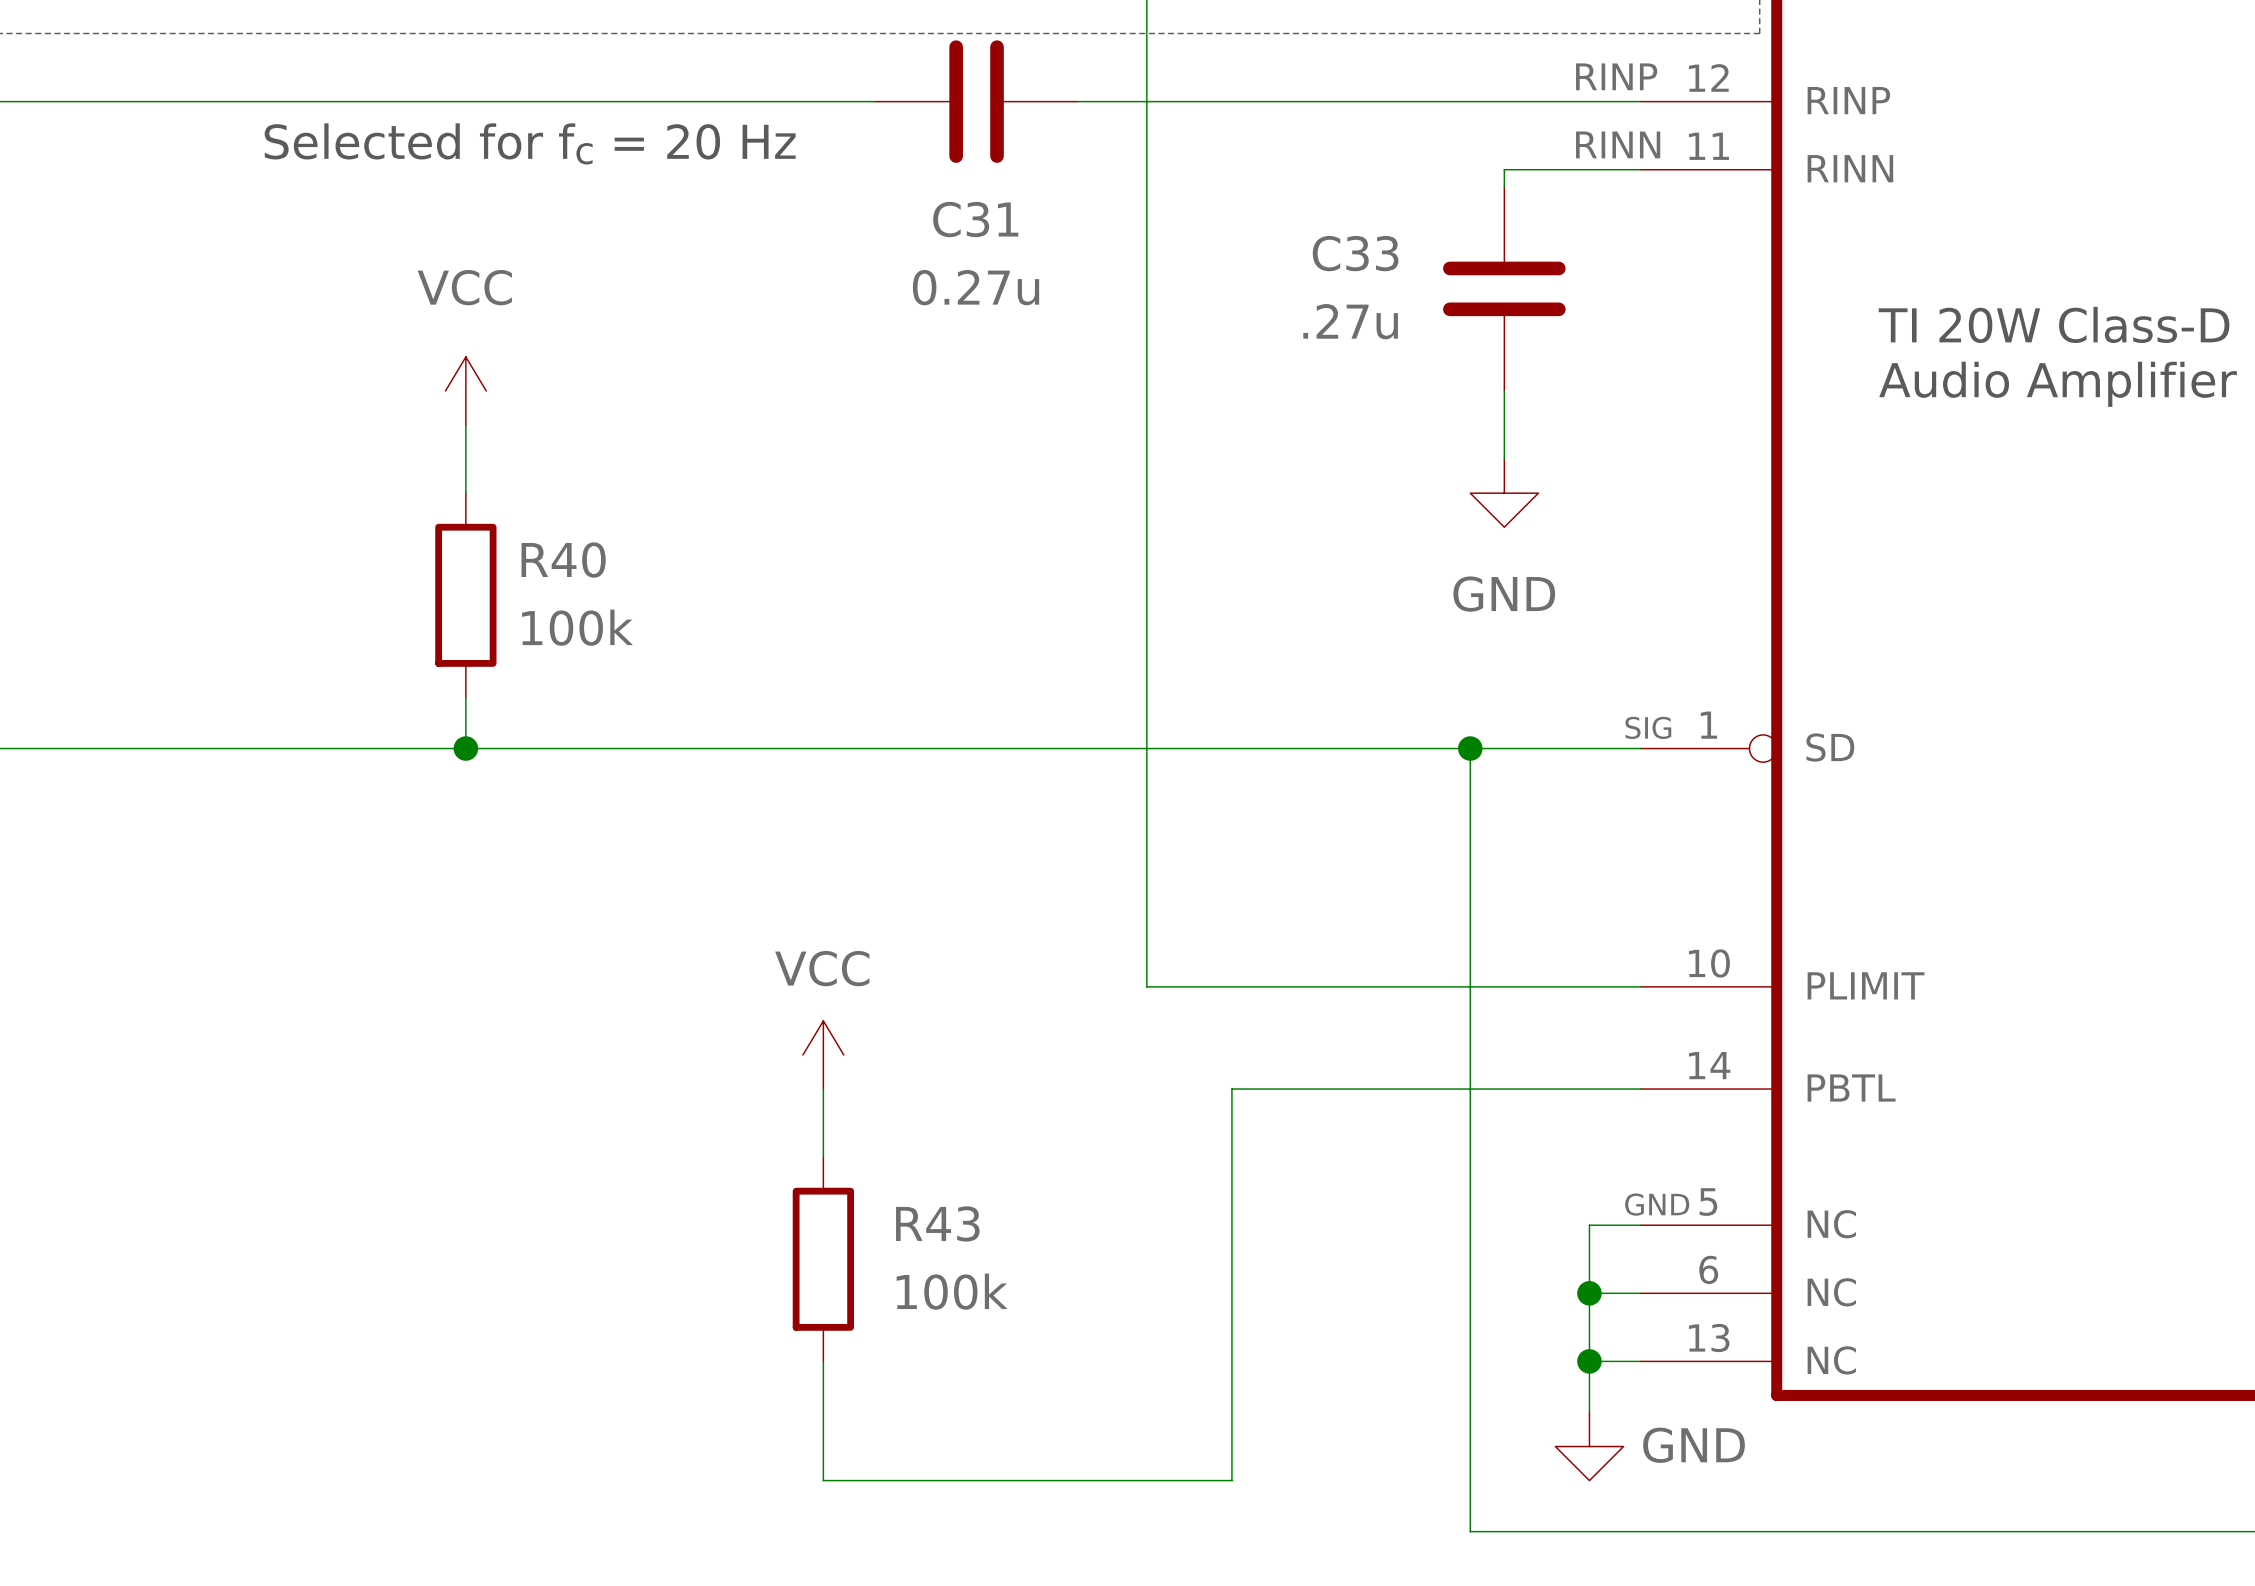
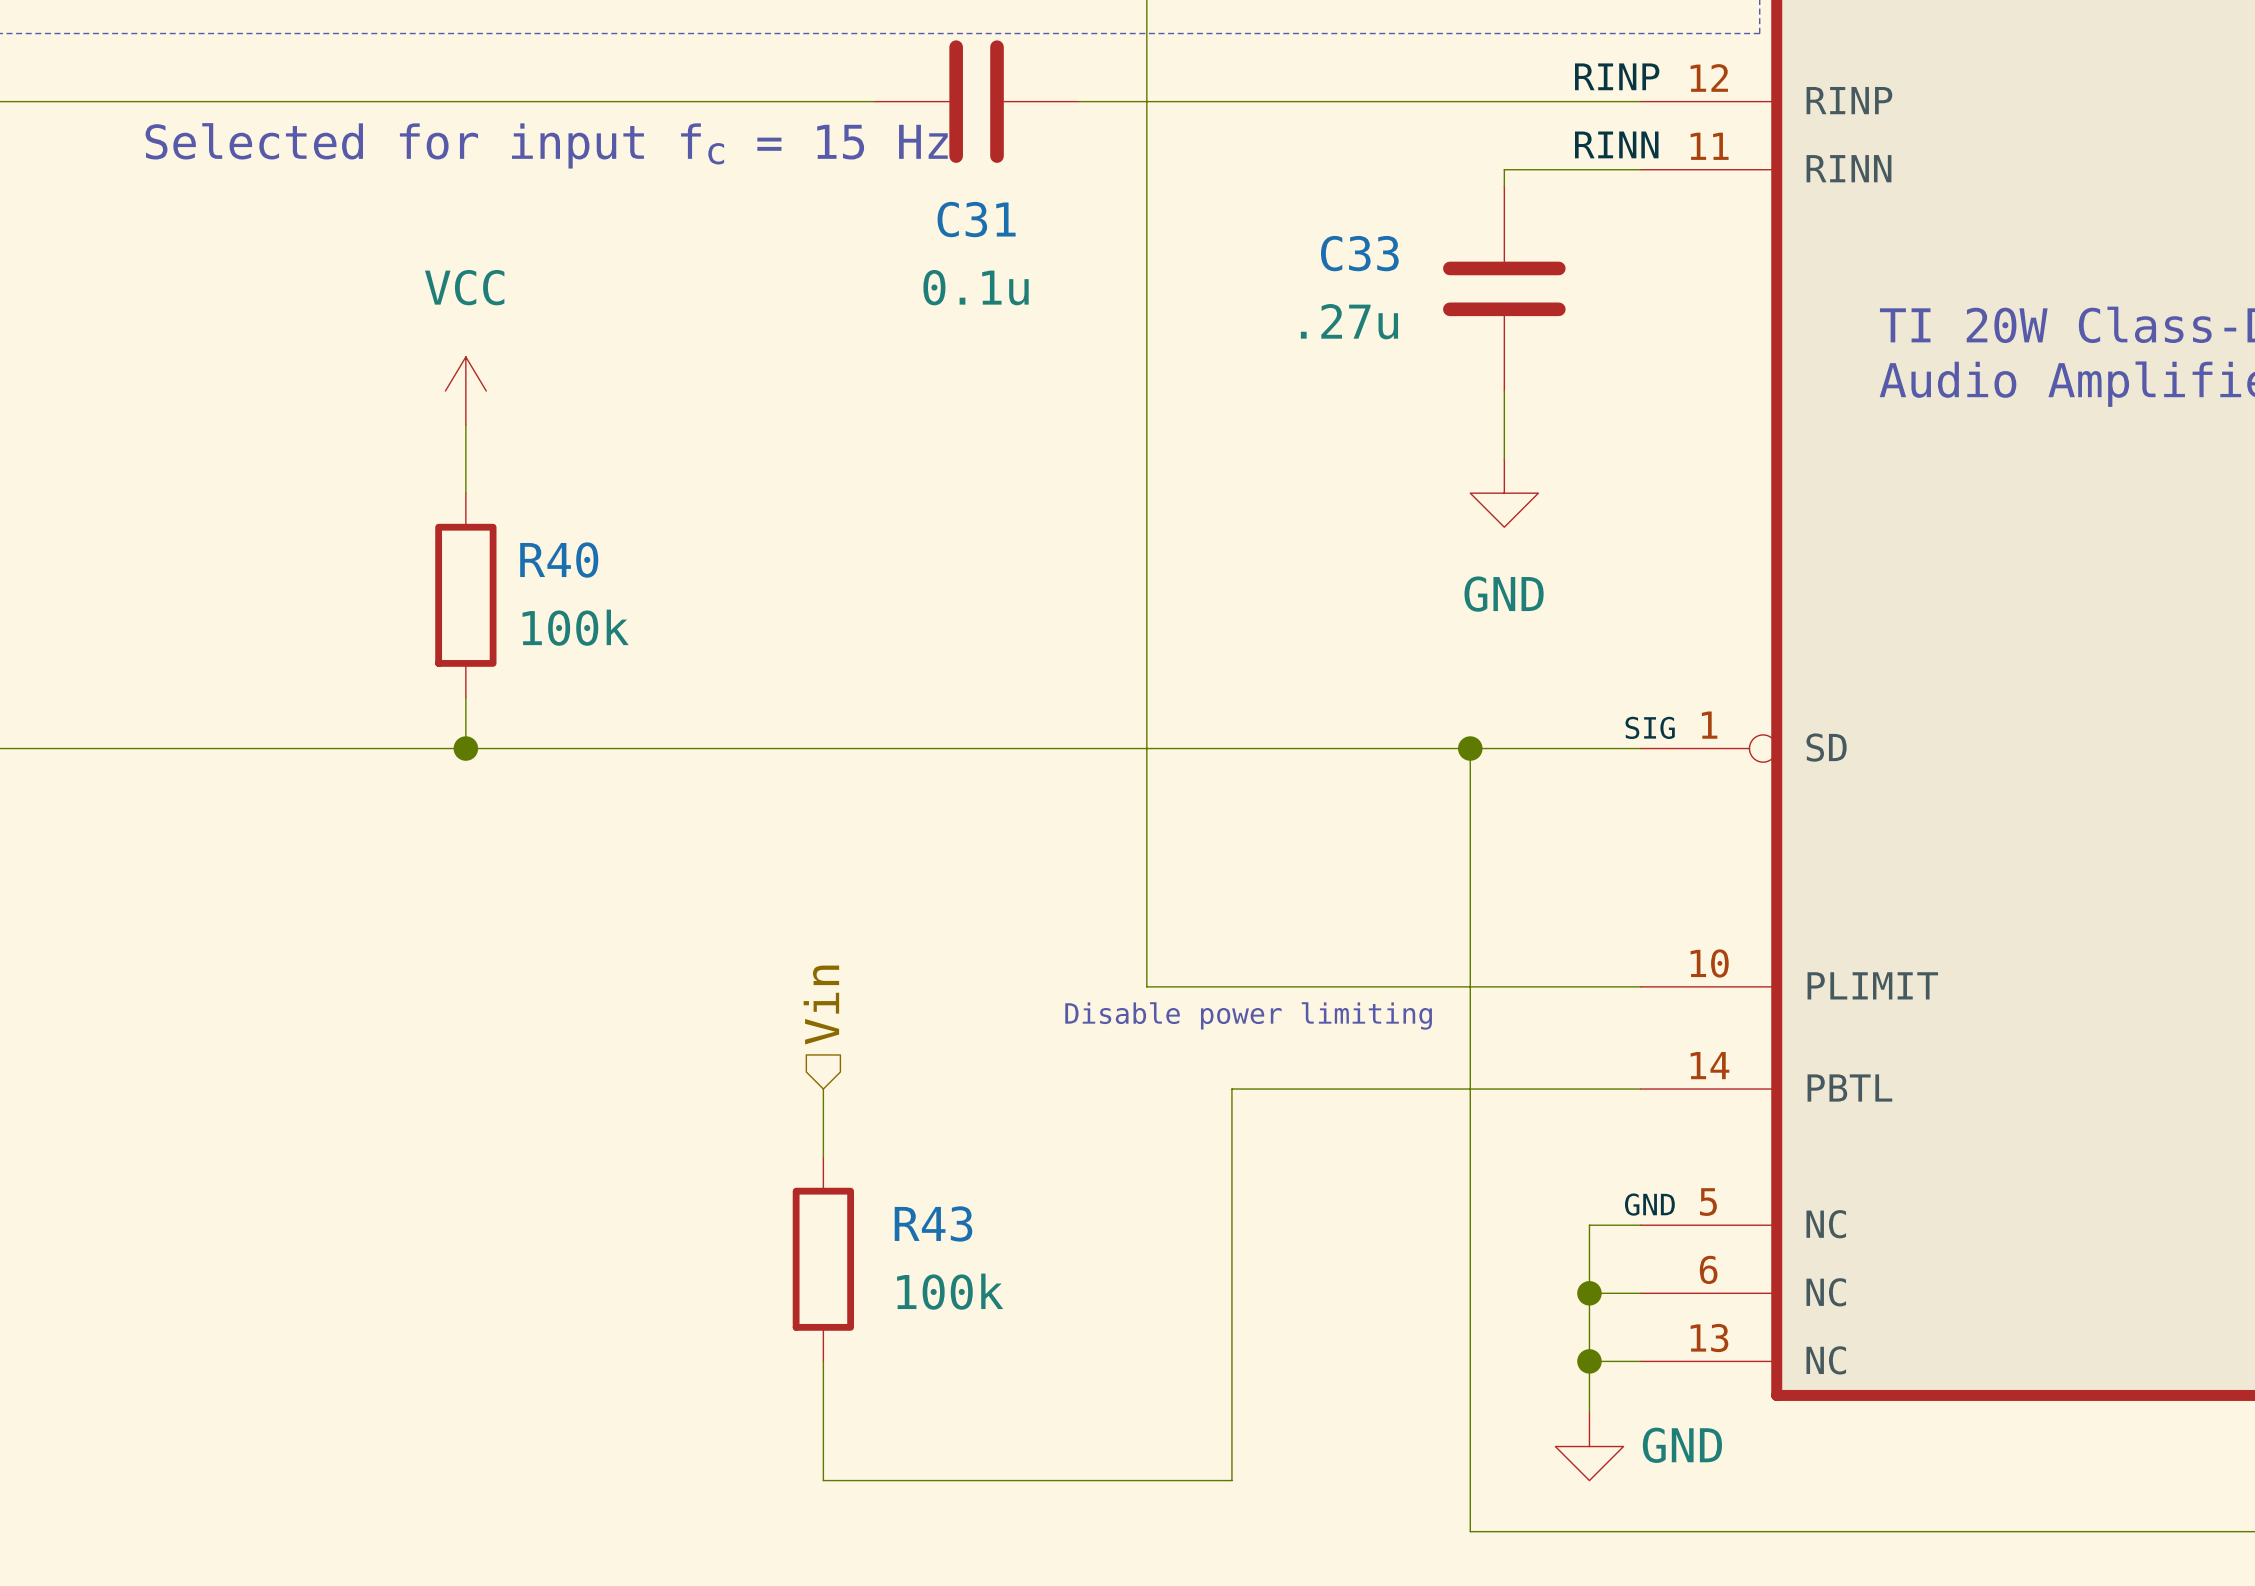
text: Selected for fc = 20 Hz (530, 143) -> Selected for input fc = 15 Hz (546, 145)
C31 value: 0.27u (976, 287) -> 0.1u (976, 287)
hierarchical label: none -> Vin (821, 1005)
text: none -> Disable power limiting (1248, 1015)
power symbol: VCC (823, 1054) -> none

